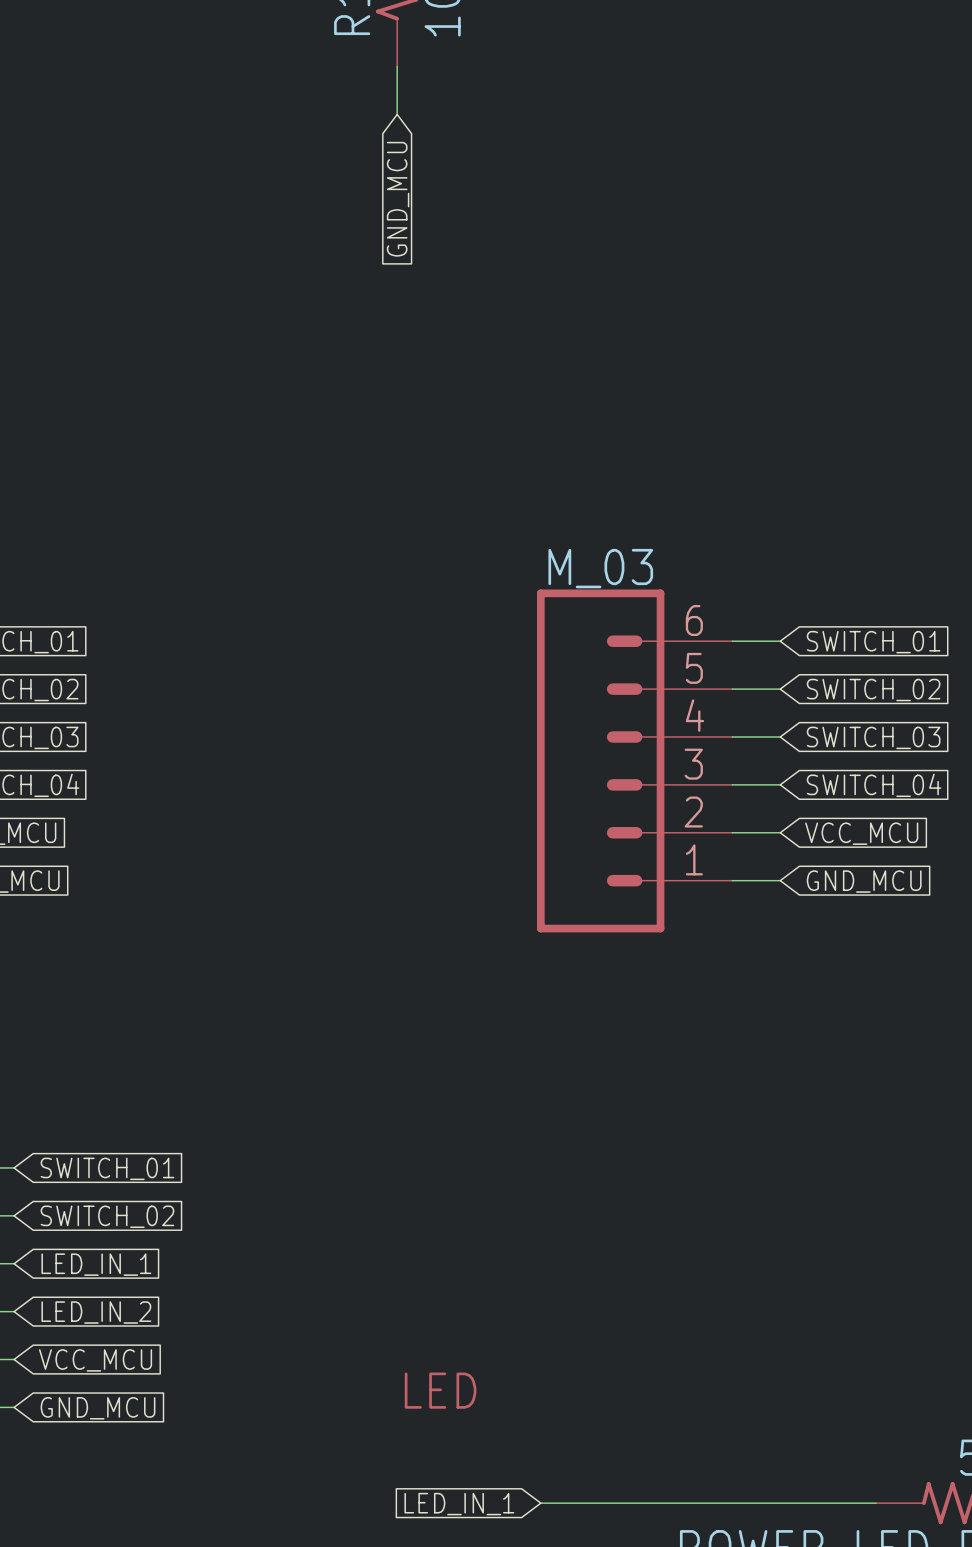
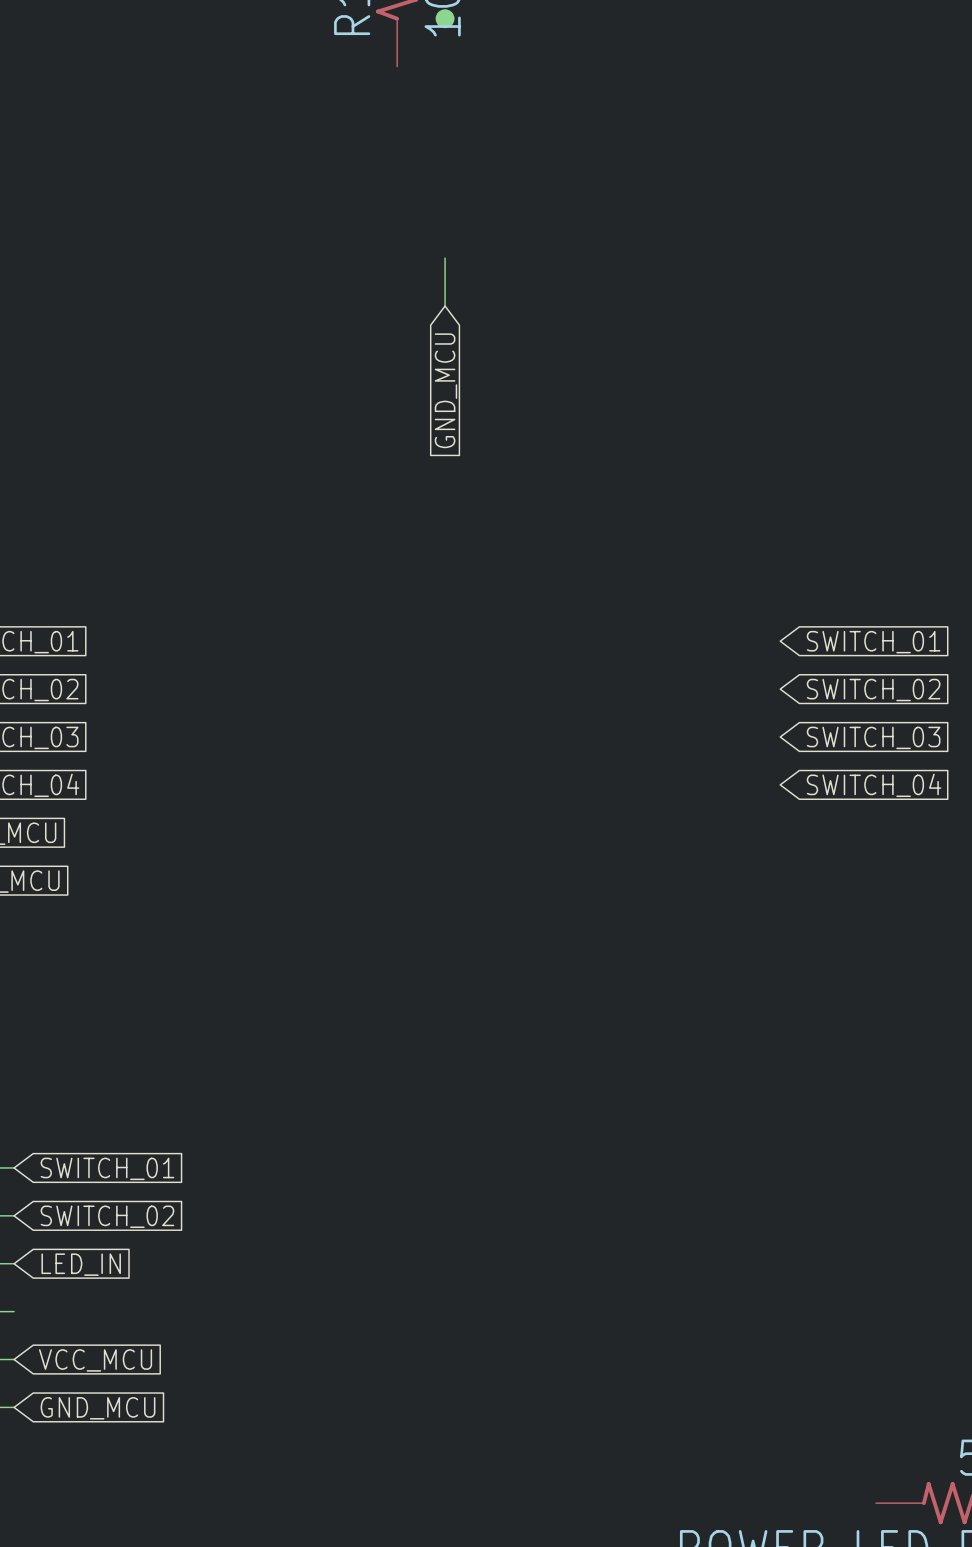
junction: none -> (445, 18)
wire: (397, 66) (397, 114) -> (445, 258) (445, 306)
global label position: GND_MCU (398, 199) -> GND_MCU (445, 390)
wire: (732, 641) (780, 641) -> none
wire: (732, 689) (780, 689) -> none
wire: (732, 737) (780, 737) -> none
M_03: (634, 760) -> none
wire: (732, 784) (780, 784) -> none
wire: (732, 832) (780, 832) -> none
global label: VCC_MCU (861, 833) -> none
wire: (732, 880) (780, 880) -> none
global label: GND_MCU (864, 881) -> none
global label: LED_IN_1 (96, 1264) -> LED_IN (81, 1264)
global label: LED_IN_2 (96, 1312) -> none
text: LED (440, 1390) -> none
wire: (540, 1503) (876, 1503) -> none
global label: LED_IN_1 (459, 1504) -> none

